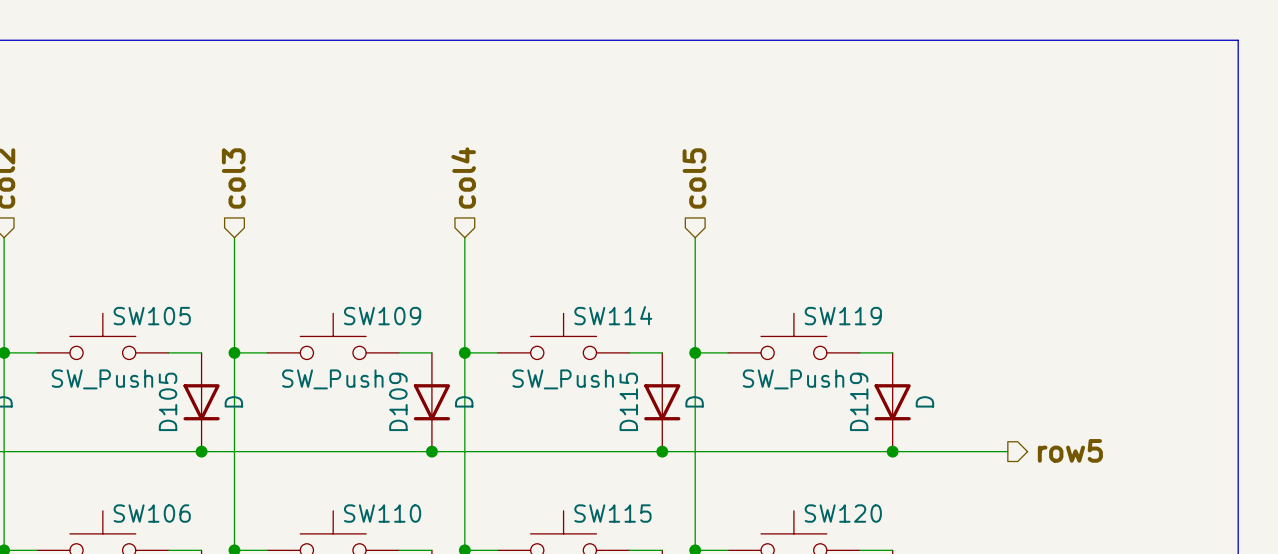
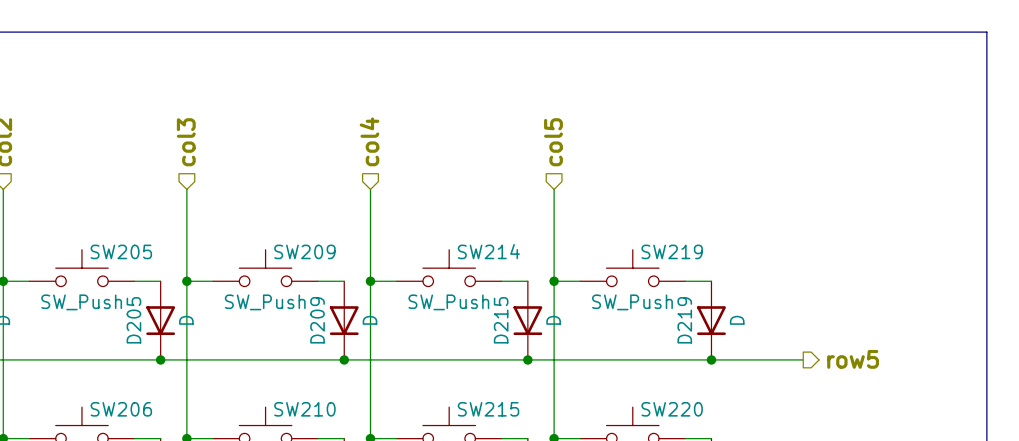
SW114 name: SW114 (613, 315) -> SW214 (488, 251)
SW105 name: SW105 (152, 316) -> SW205 (121, 251)
SW109 name: SW109 (382, 316) -> SW209 (304, 251)
SW119 name: SW119 (843, 316) -> SW219 (672, 251)
D105 name: D105 (168, 401) -> D205 (133, 320)
D109 name: D109 (398, 401) -> D209 (317, 320)
D115 name: D115 (628, 401) -> D215 (501, 320)
D119 name: D119 (859, 401) -> D219 (684, 320)
SW106 name: SW106 (152, 513) -> SW206 (121, 409)
SW110 name: SW110 (382, 513) -> SW210 (304, 409)
SW115 name: SW115 (612, 513) -> SW215 (488, 409)
SW120 name: SW120 (843, 513) -> SW220 (672, 409)

